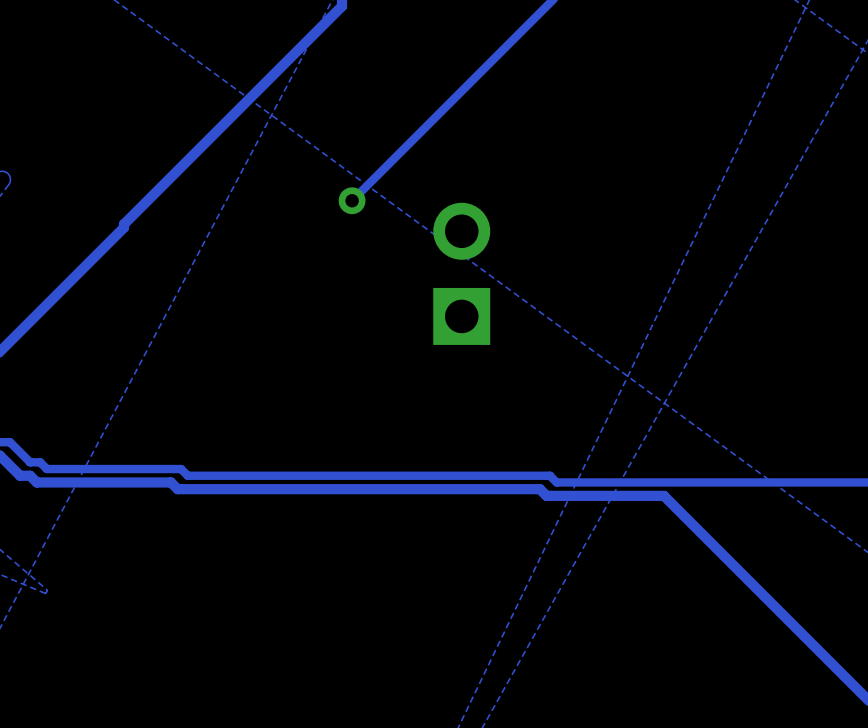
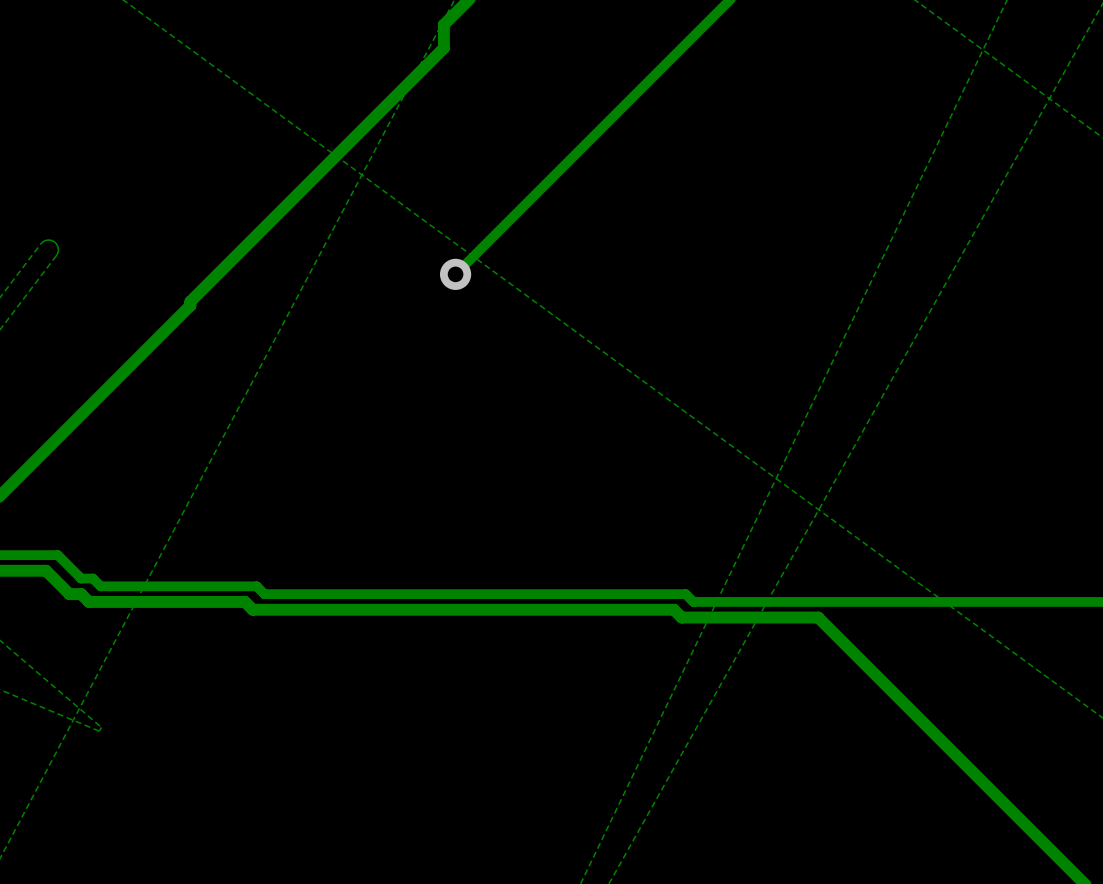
part: (461, 273) -> none

